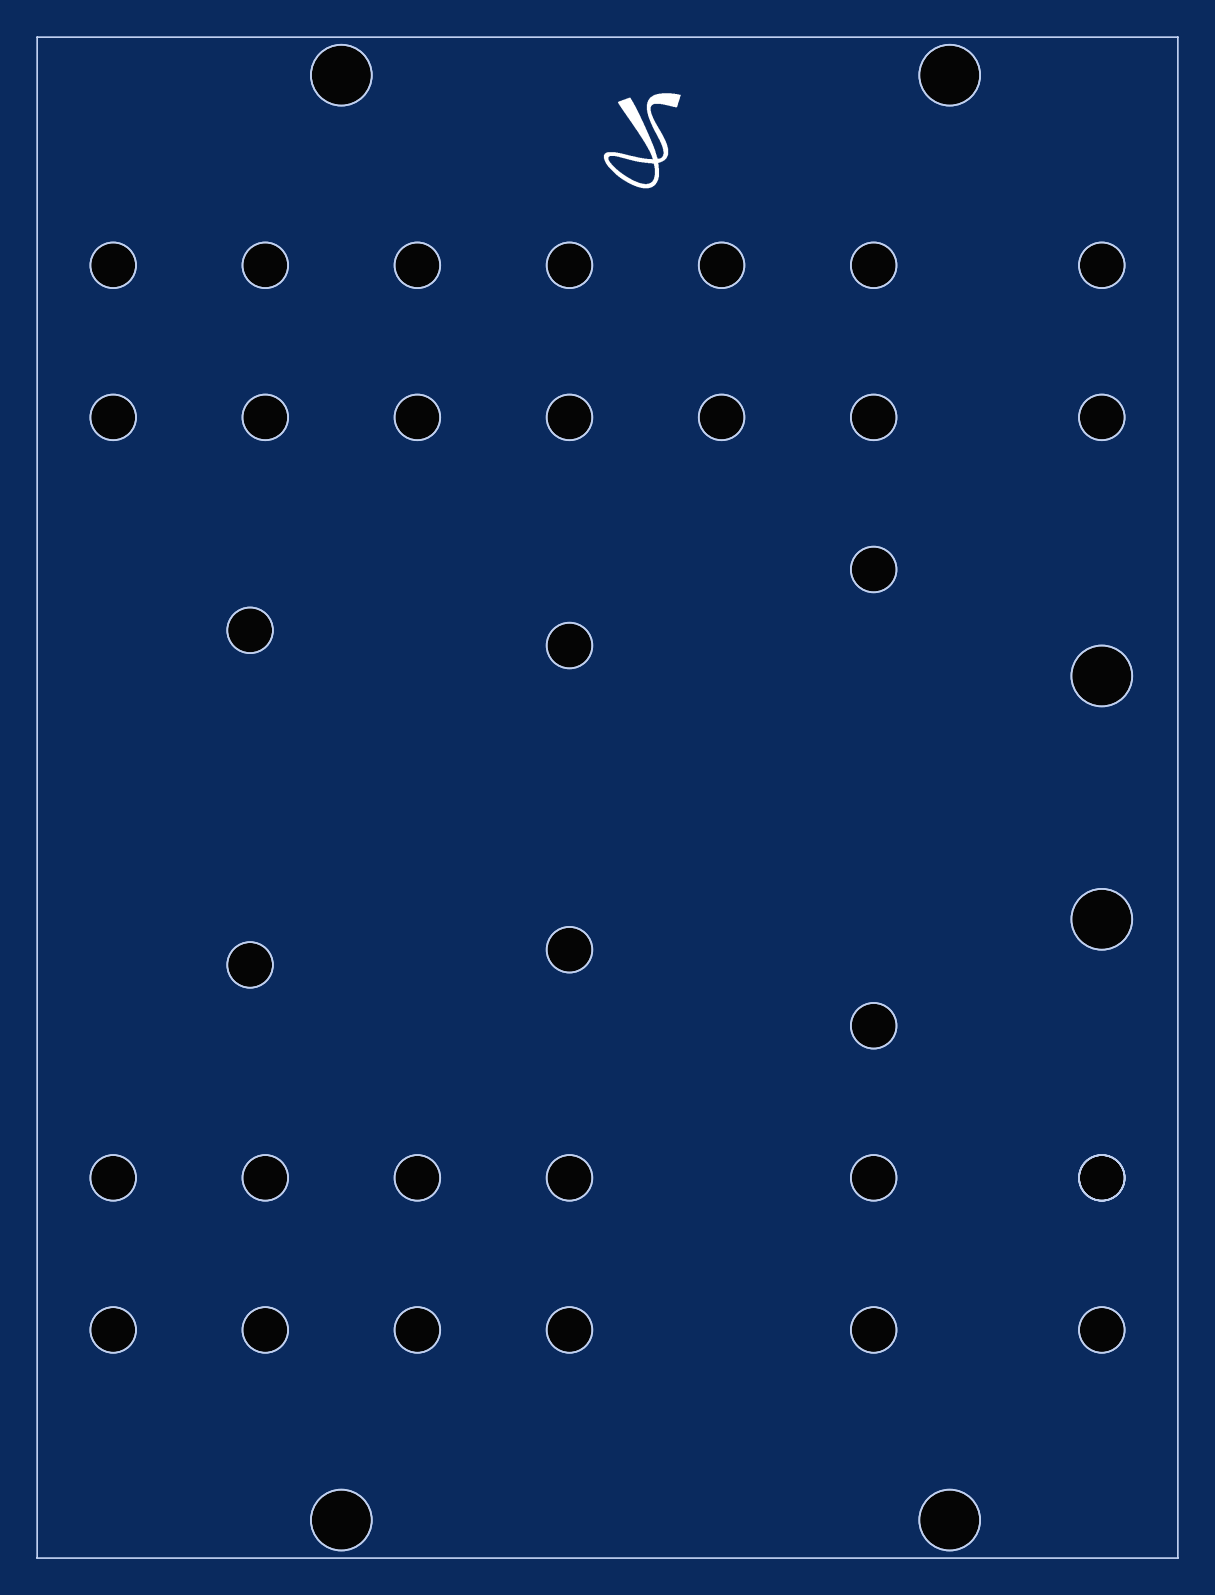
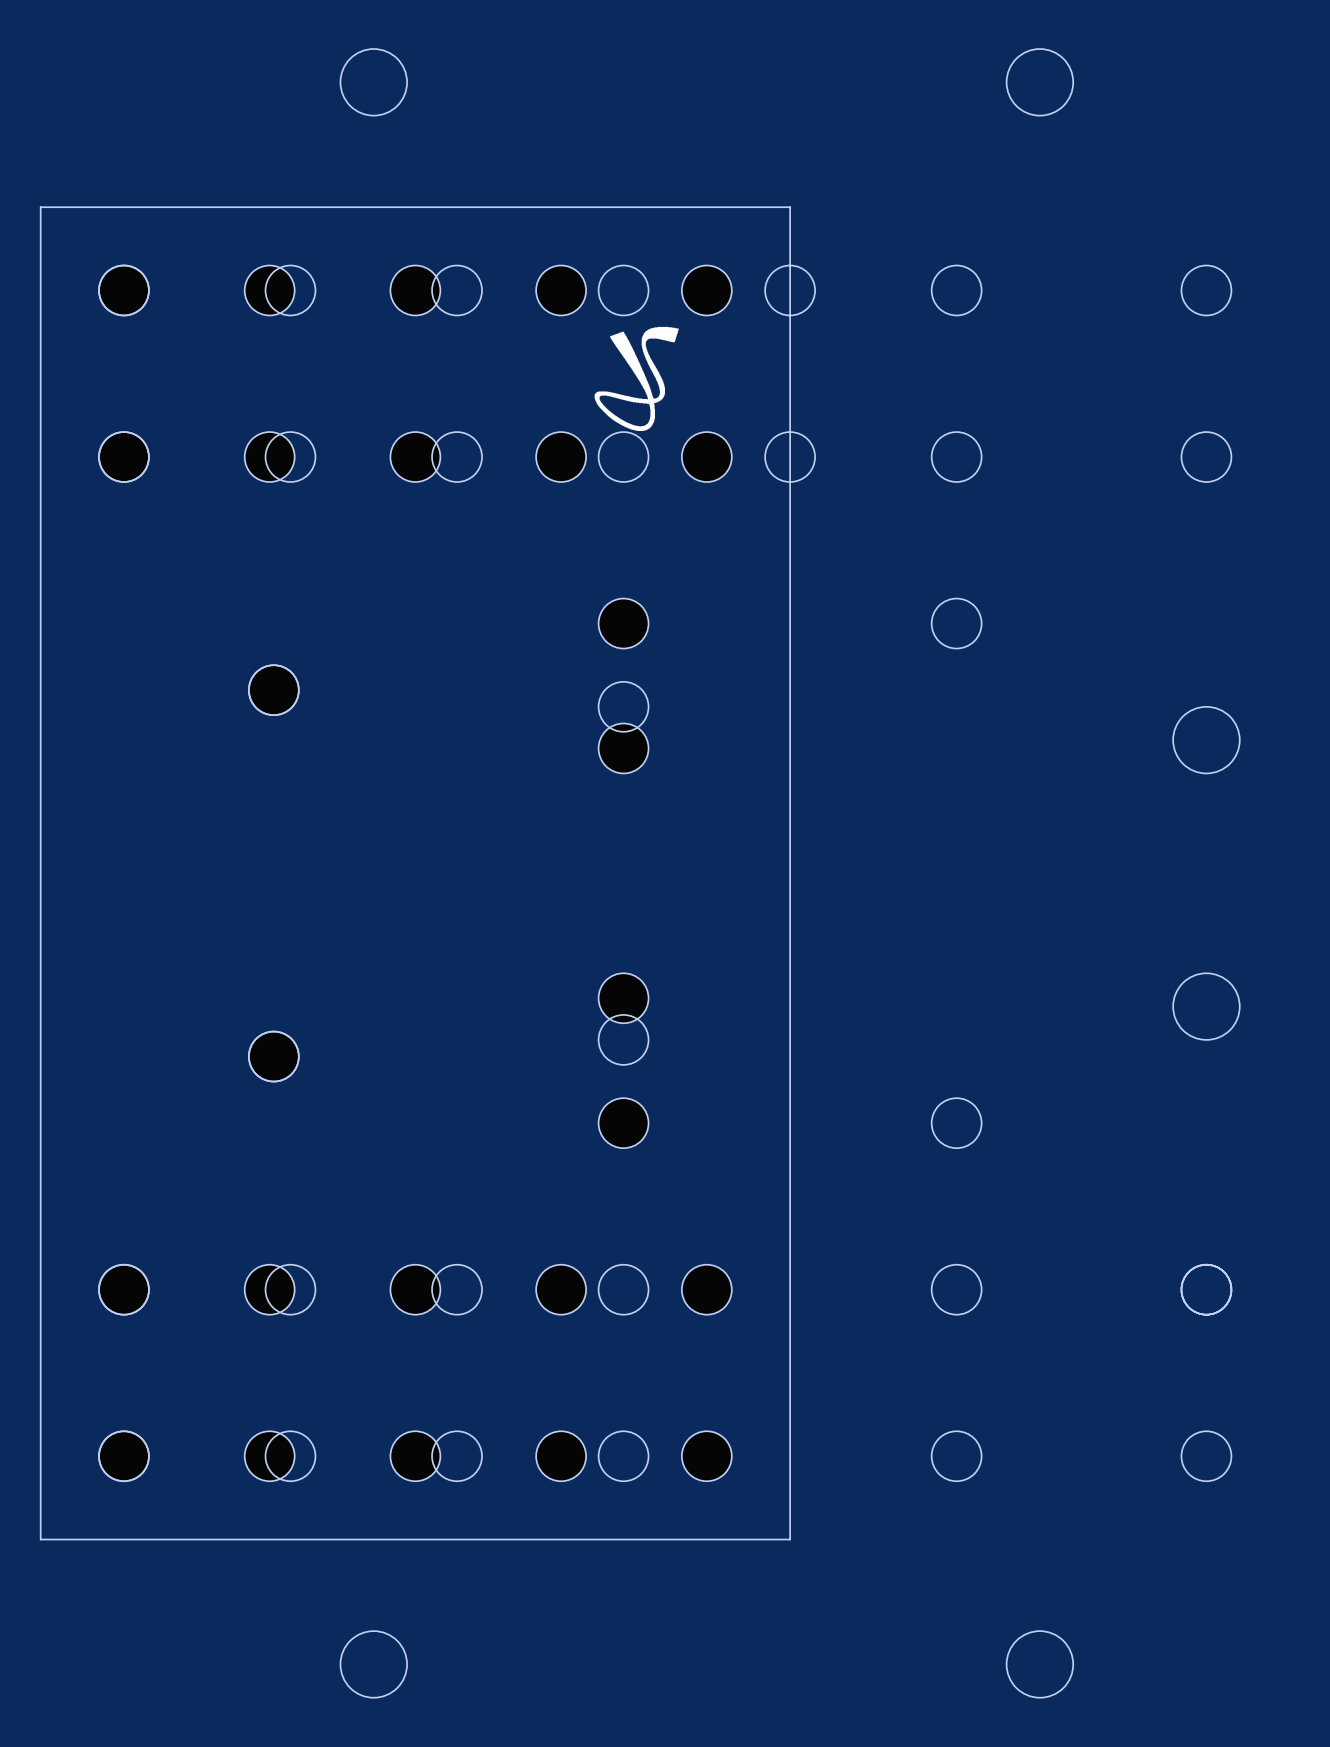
hole: (341, 75) -> none
hole: (949, 75) -> none
drawing position: (642, 140) -> (636, 378)
board edge: (37, 189) (37, 37) (1177, 37) (1177, 1558) (37, 1558) (37, 1406) -> (40, 207) (790, 207) (790, 1539) (40, 1539)
hole position: (265, 265) -> (269, 290)
hole position: (417, 265) -> (415, 290)
hole: none -> (561, 290)
hole: (569, 265) -> none
hole: none -> (706, 290)
hole: (721, 265) -> none
hole: (873, 265) -> none
hole: (1101, 265) -> none
hole position: (265, 417) -> (269, 457)
hole position: (417, 417) -> (415, 457)
hole: none -> (561, 457)
hole: (569, 417) -> none
hole: none -> (706, 457)
hole: (721, 417) -> none
hole: (873, 417) -> none
hole: (1101, 417) -> none
hole: none -> (623, 623)
hole: (873, 569) -> none
hole: (569, 645) -> none
hole: (1101, 675) -> none
hole: none -> (623, 748)
hole: none -> (623, 998)
hole: (1101, 919) -> none
hole: (569, 949) -> none
hole: none -> (623, 1123)
hole: (873, 1025) -> none
hole position: (265, 1177) -> (269, 1289)
hole position: (417, 1177) -> (415, 1289)
hole: none -> (561, 1289)
hole: (569, 1177) -> none
hole: none -> (706, 1289)
hole: (873, 1177) -> none
hole: (1101, 1177) -> none
hole position: (265, 1329) -> (269, 1456)
hole position: (417, 1329) -> (415, 1456)
hole: none -> (561, 1456)
hole: (569, 1329) -> none
hole: none -> (706, 1456)
hole: (873, 1329) -> none
hole: (1101, 1329) -> none
hole: (341, 1520) -> none
hole: (949, 1520) -> none

